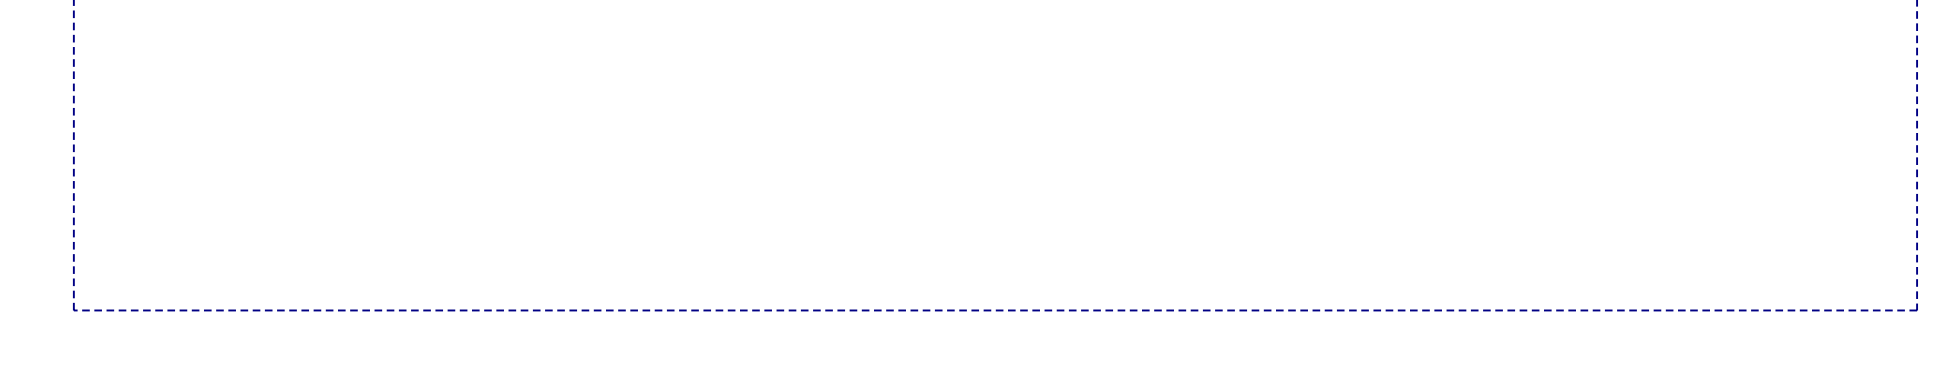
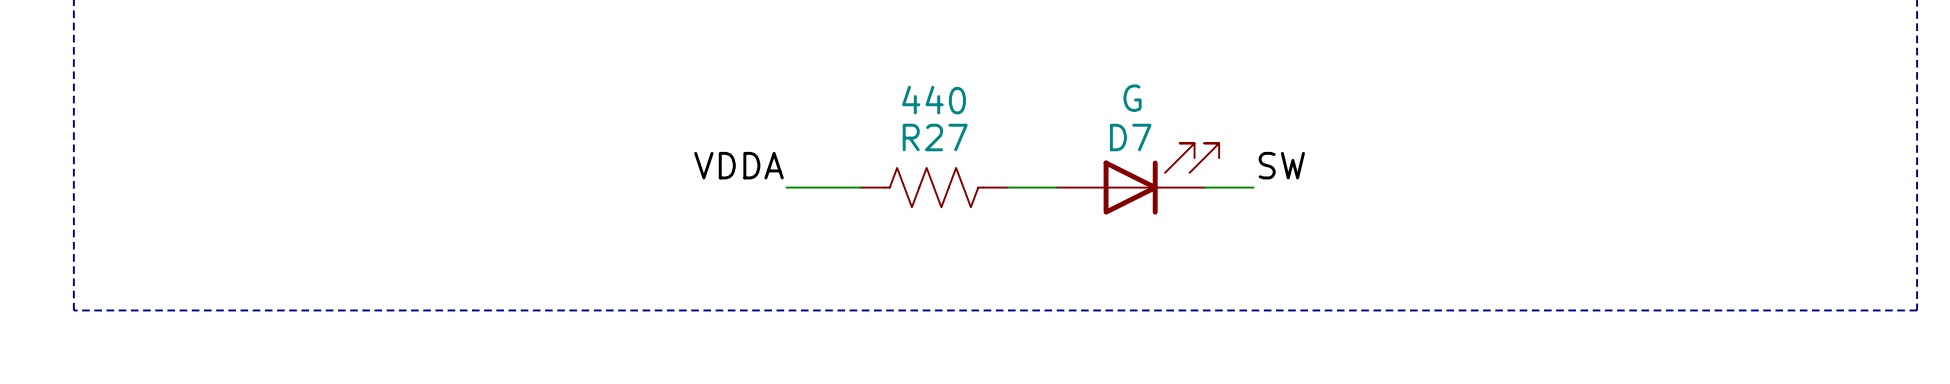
label: none -> VDDA (738, 165)
label: none -> SW (1281, 165)
D7: none -> G (1138, 178)
wire: none -> (786, 187) (860, 187)
R27: none -> 440 (934, 187)
wire: none -> (1007, 187) (1056, 187)
wire: none -> (1204, 187) (1253, 187)

